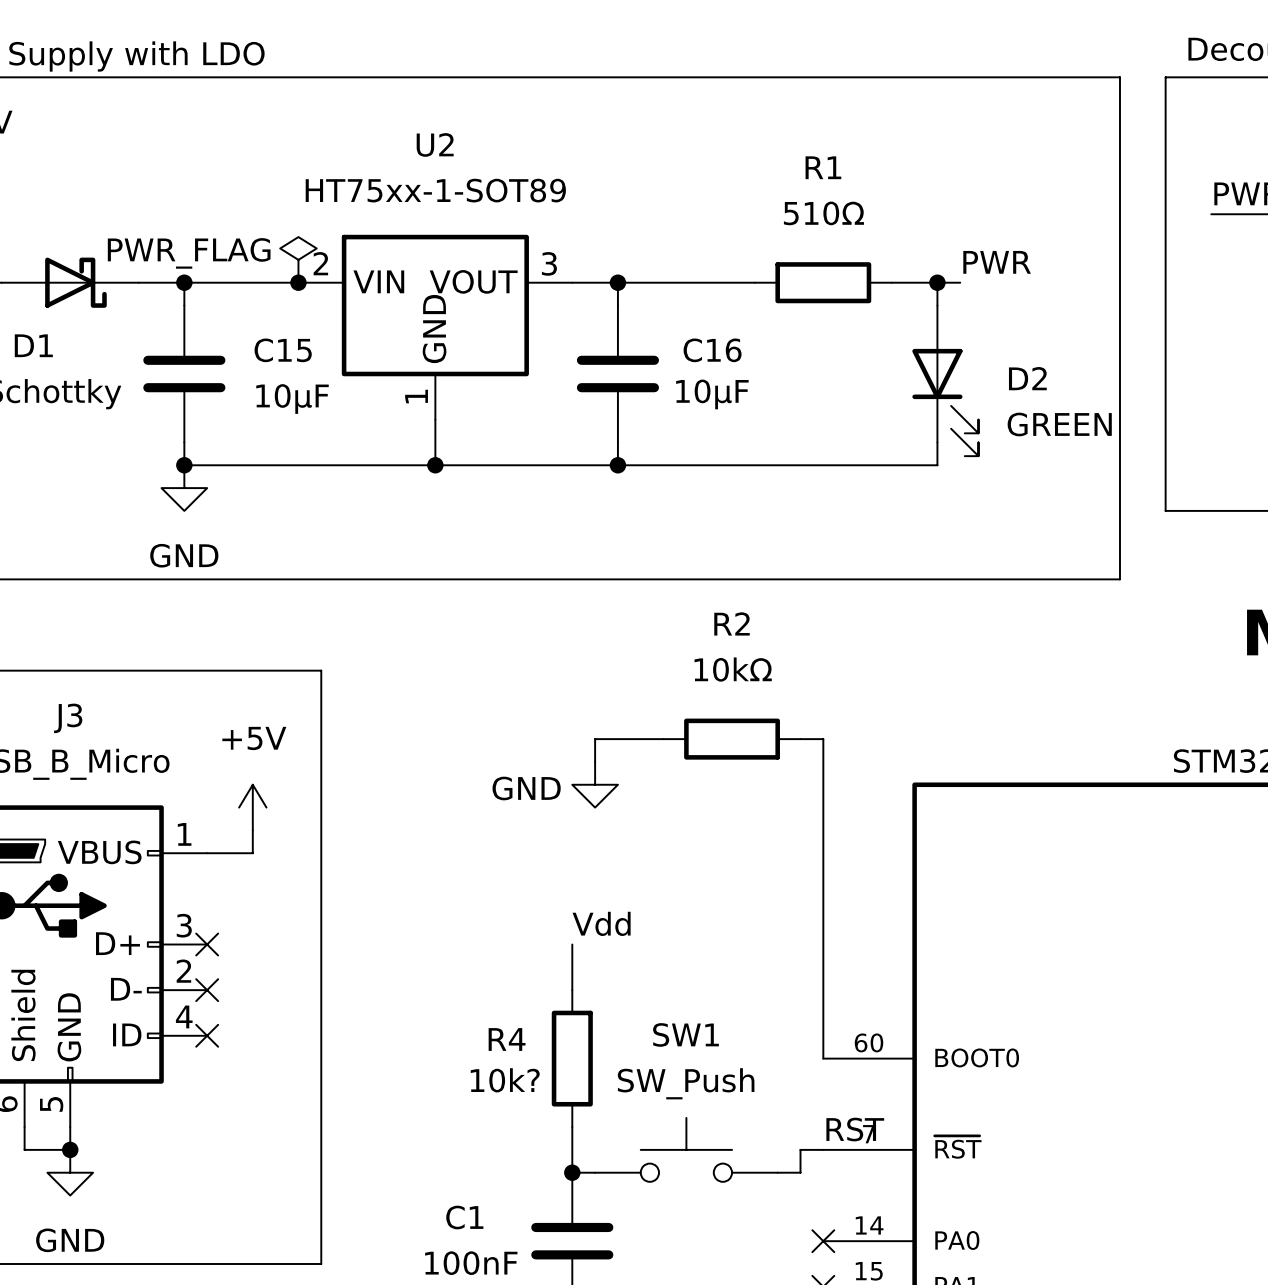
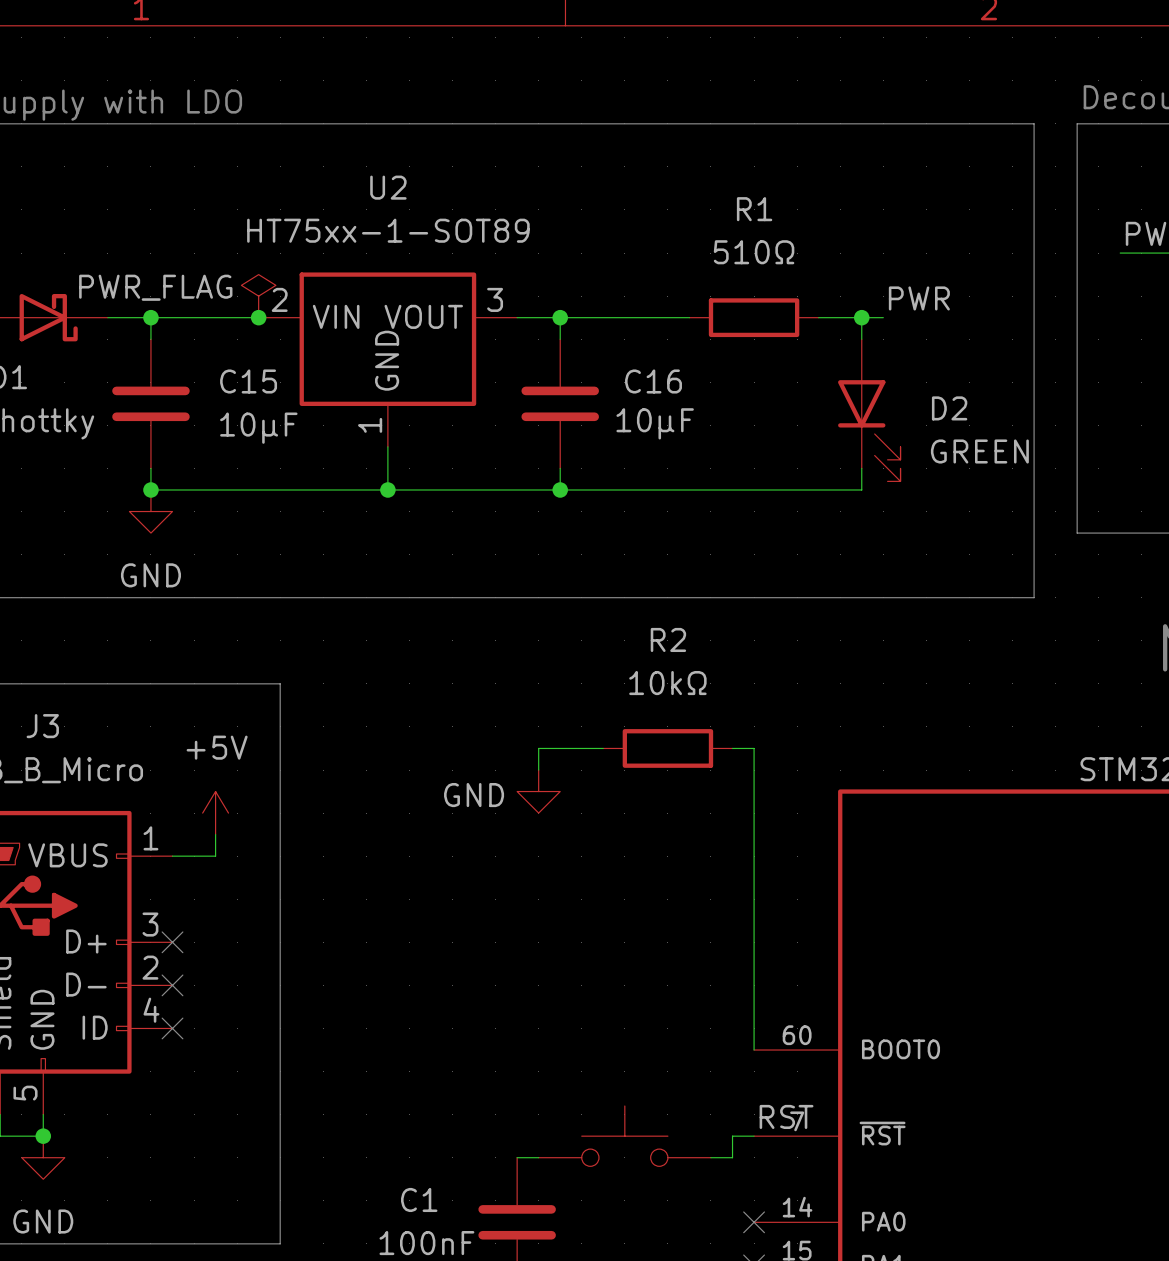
label: Vdd (601, 923) -> none
wire: (572, 944) (572, 990) -> none
SW1 name: SW1 (685, 1034) -> none
R4: 10k? (572, 1058) -> none
SW1 value: SW_Push (686, 1083) -> none
wire: (572, 1127) (572, 1172) -> none
junction: (572, 1172) -> none

